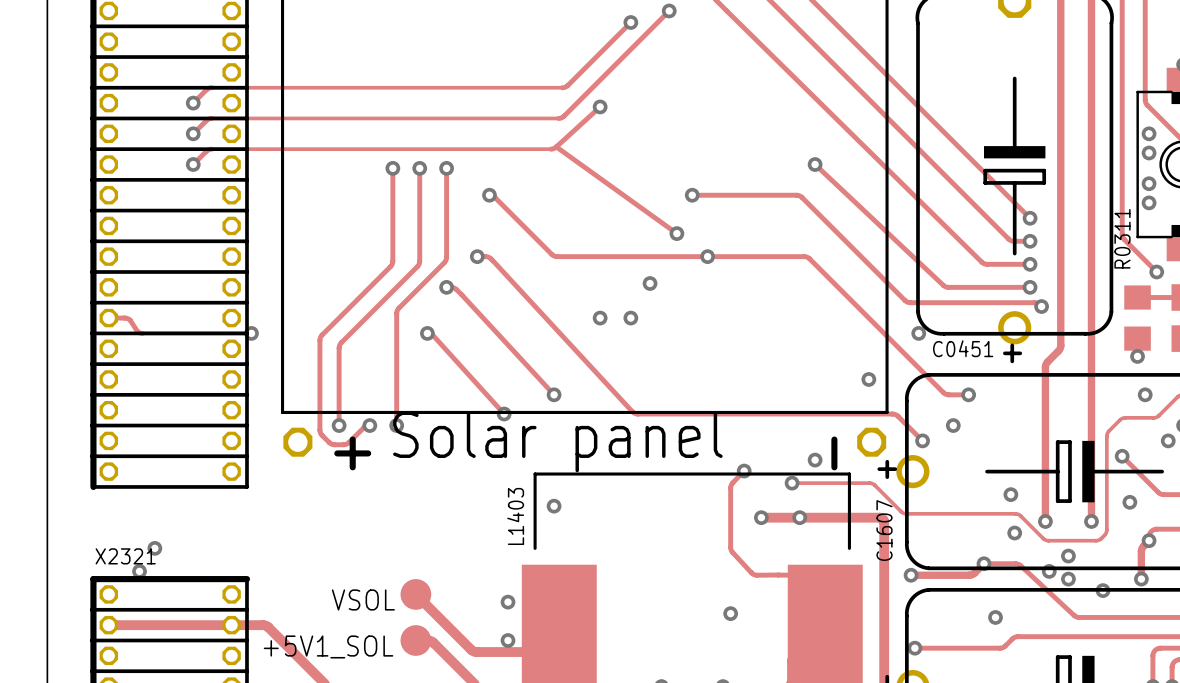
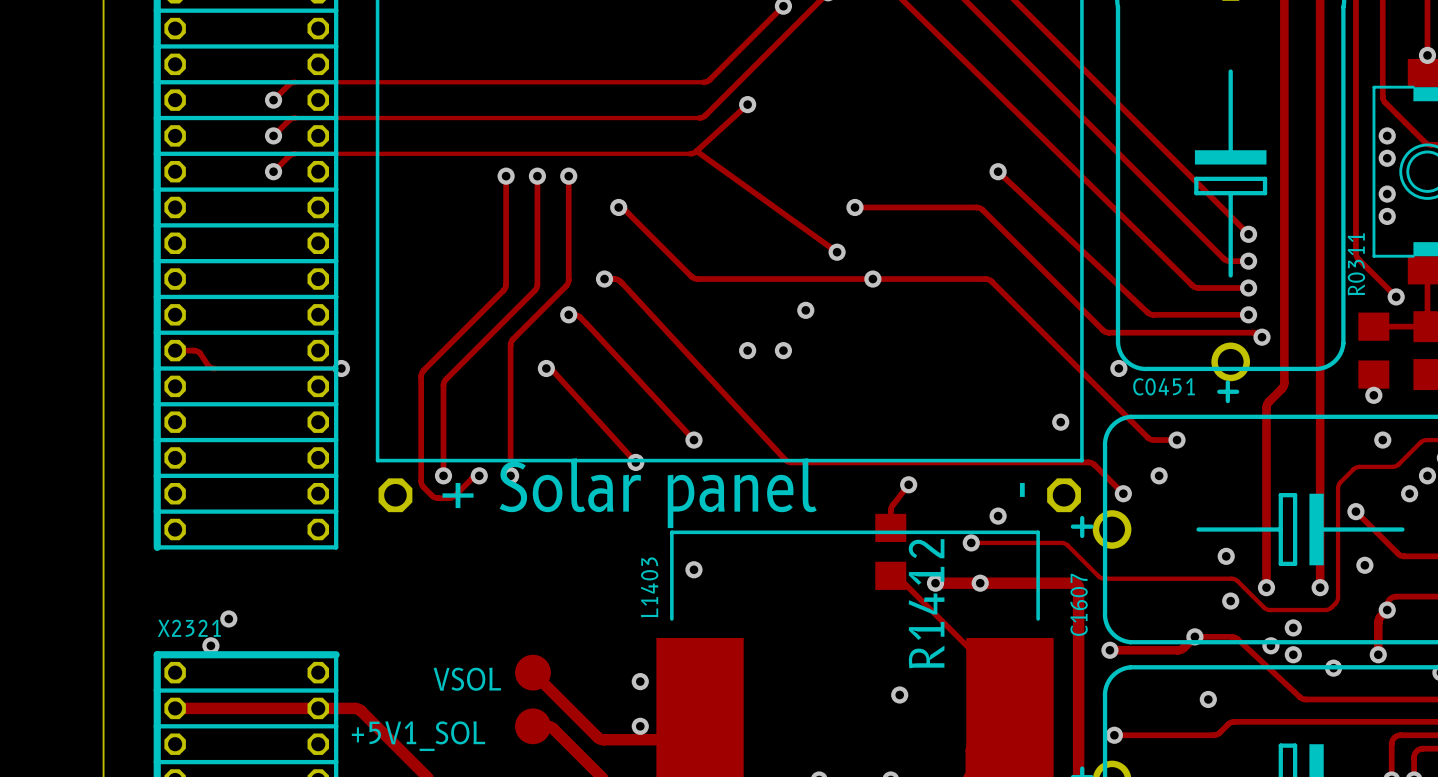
track: none -> (908, 484) (891, 507) (890, 527)
track: (744, 471) (730, 487) (731, 550) (753, 574) (792, 575) -> (890, 575) (899, 578) (971, 650)
via position: (744, 471) -> (908, 484)
R1412: none -> (890, 551)

